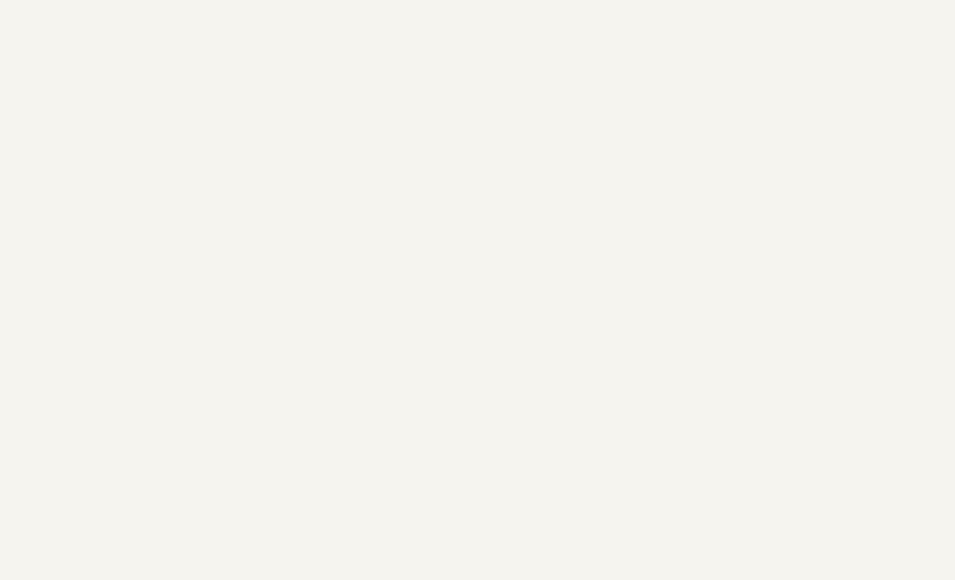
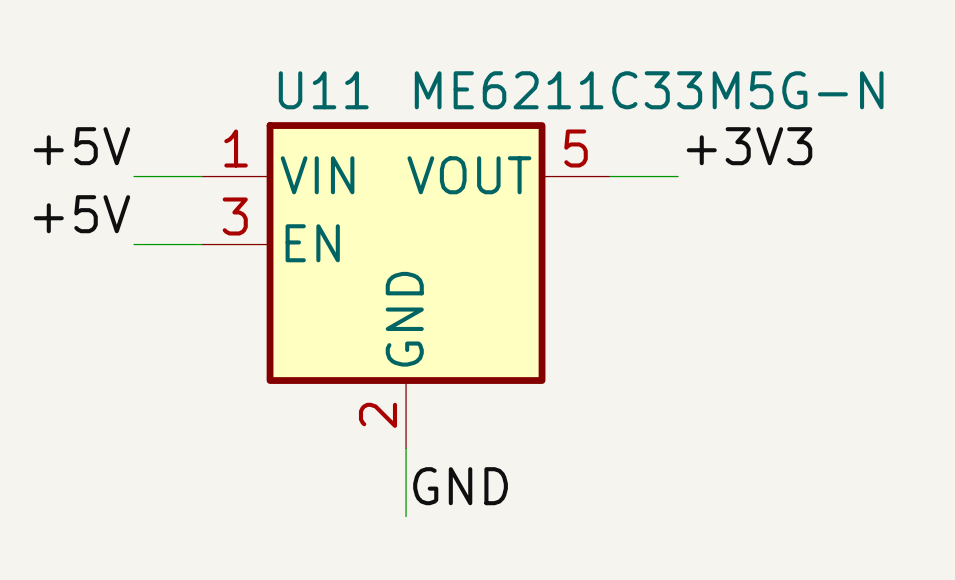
label: none -> +5V (81, 146)
label: none -> +3V3 (749, 146)
wire: none -> (134, 176) (202, 176)
wire: none -> (610, 176) (678, 176)
label: none -> +5V (81, 214)
wire: none -> (134, 244) (202, 244)
U11: none -> ME6211C33M5G-N (406, 285)
wire: none -> (406, 448) (406, 516)
label: none -> GND (460, 486)

